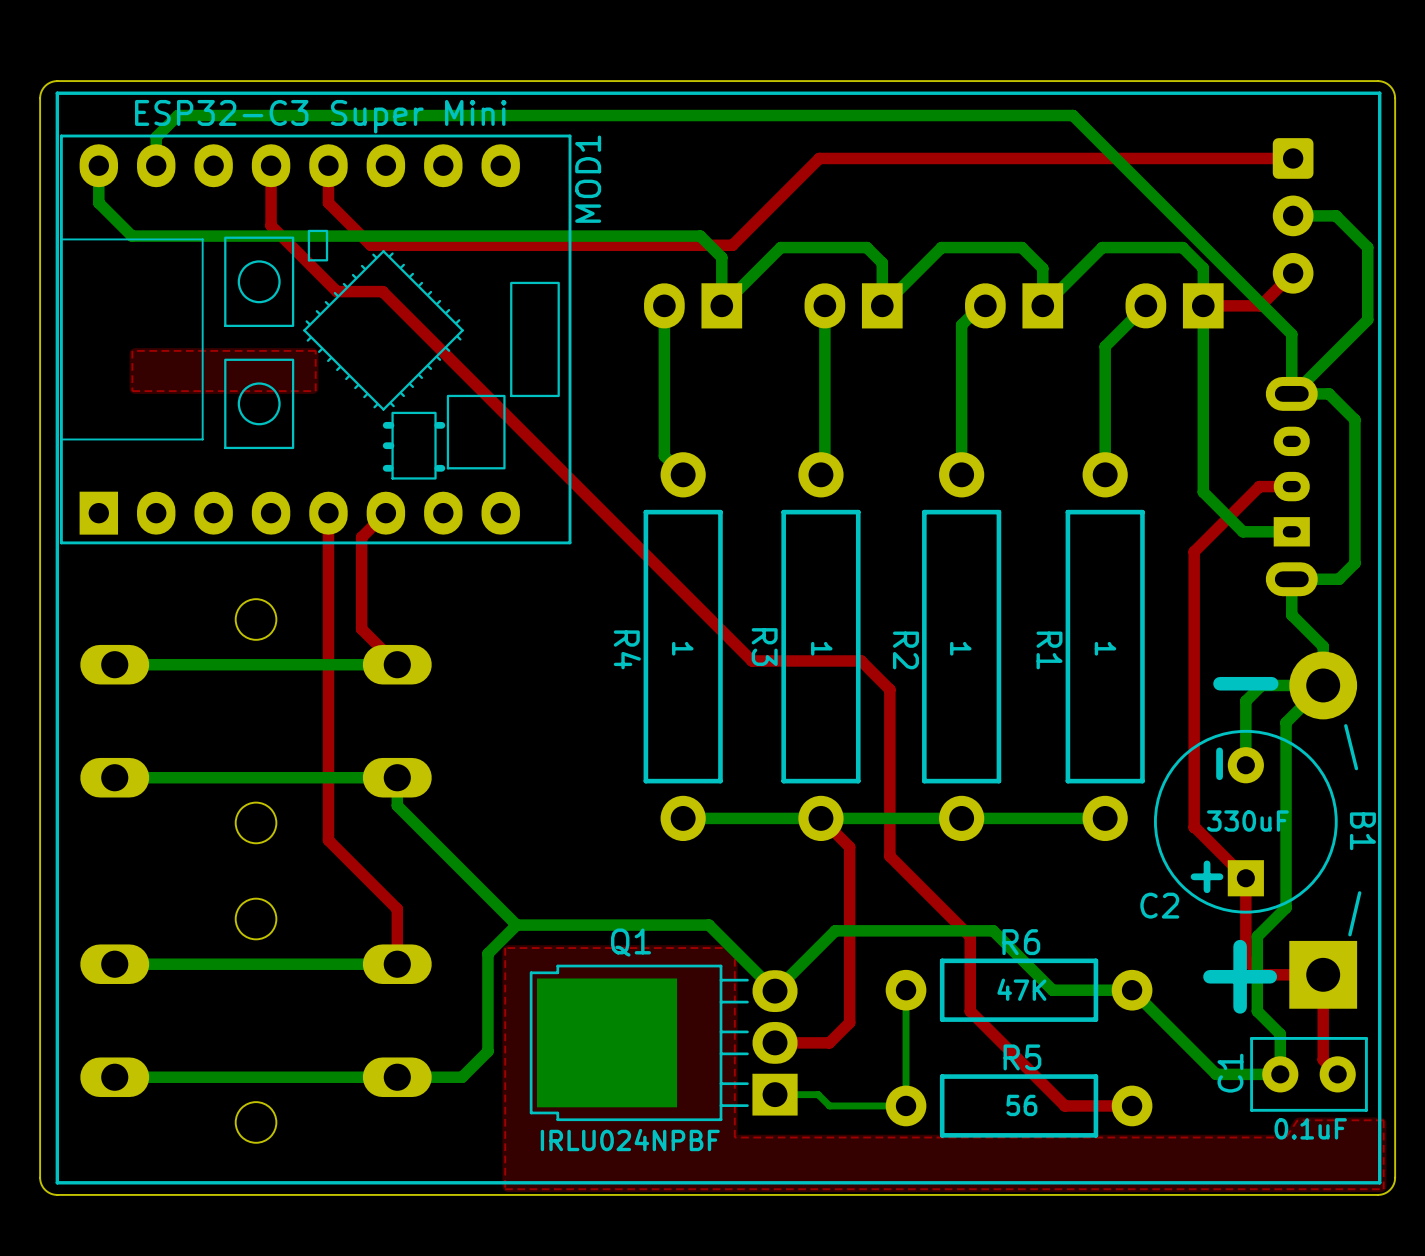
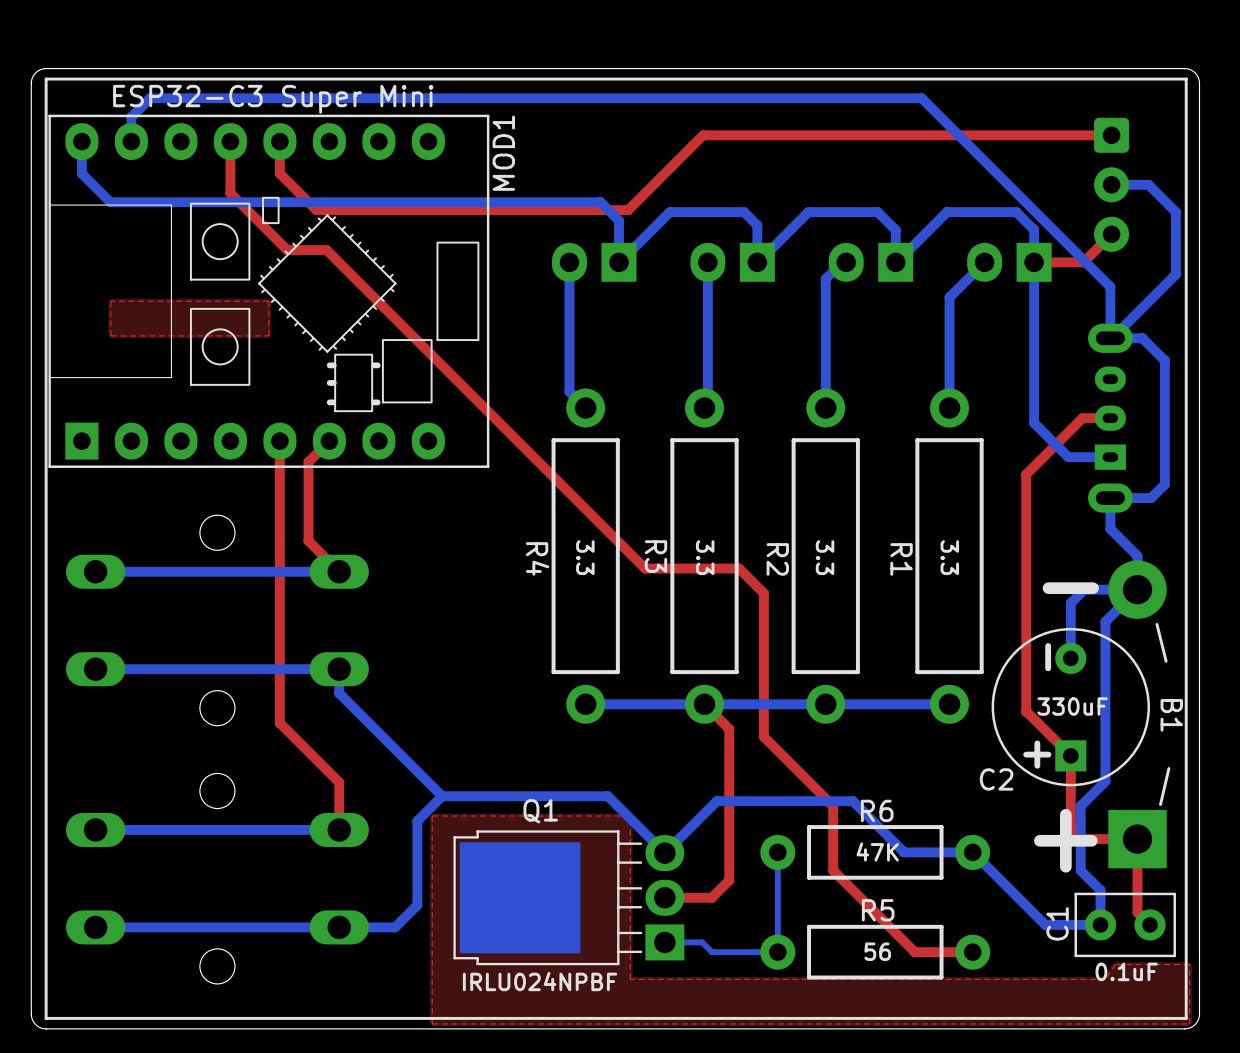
text: 1 (682, 648) -> 3.3 (585, 557)
text: 1 (821, 648) -> 3.3 (705, 557)
text: 1 (960, 648) -> 3.3 (825, 557)
text: 1 (1105, 648) -> 3.3 (949, 557)

